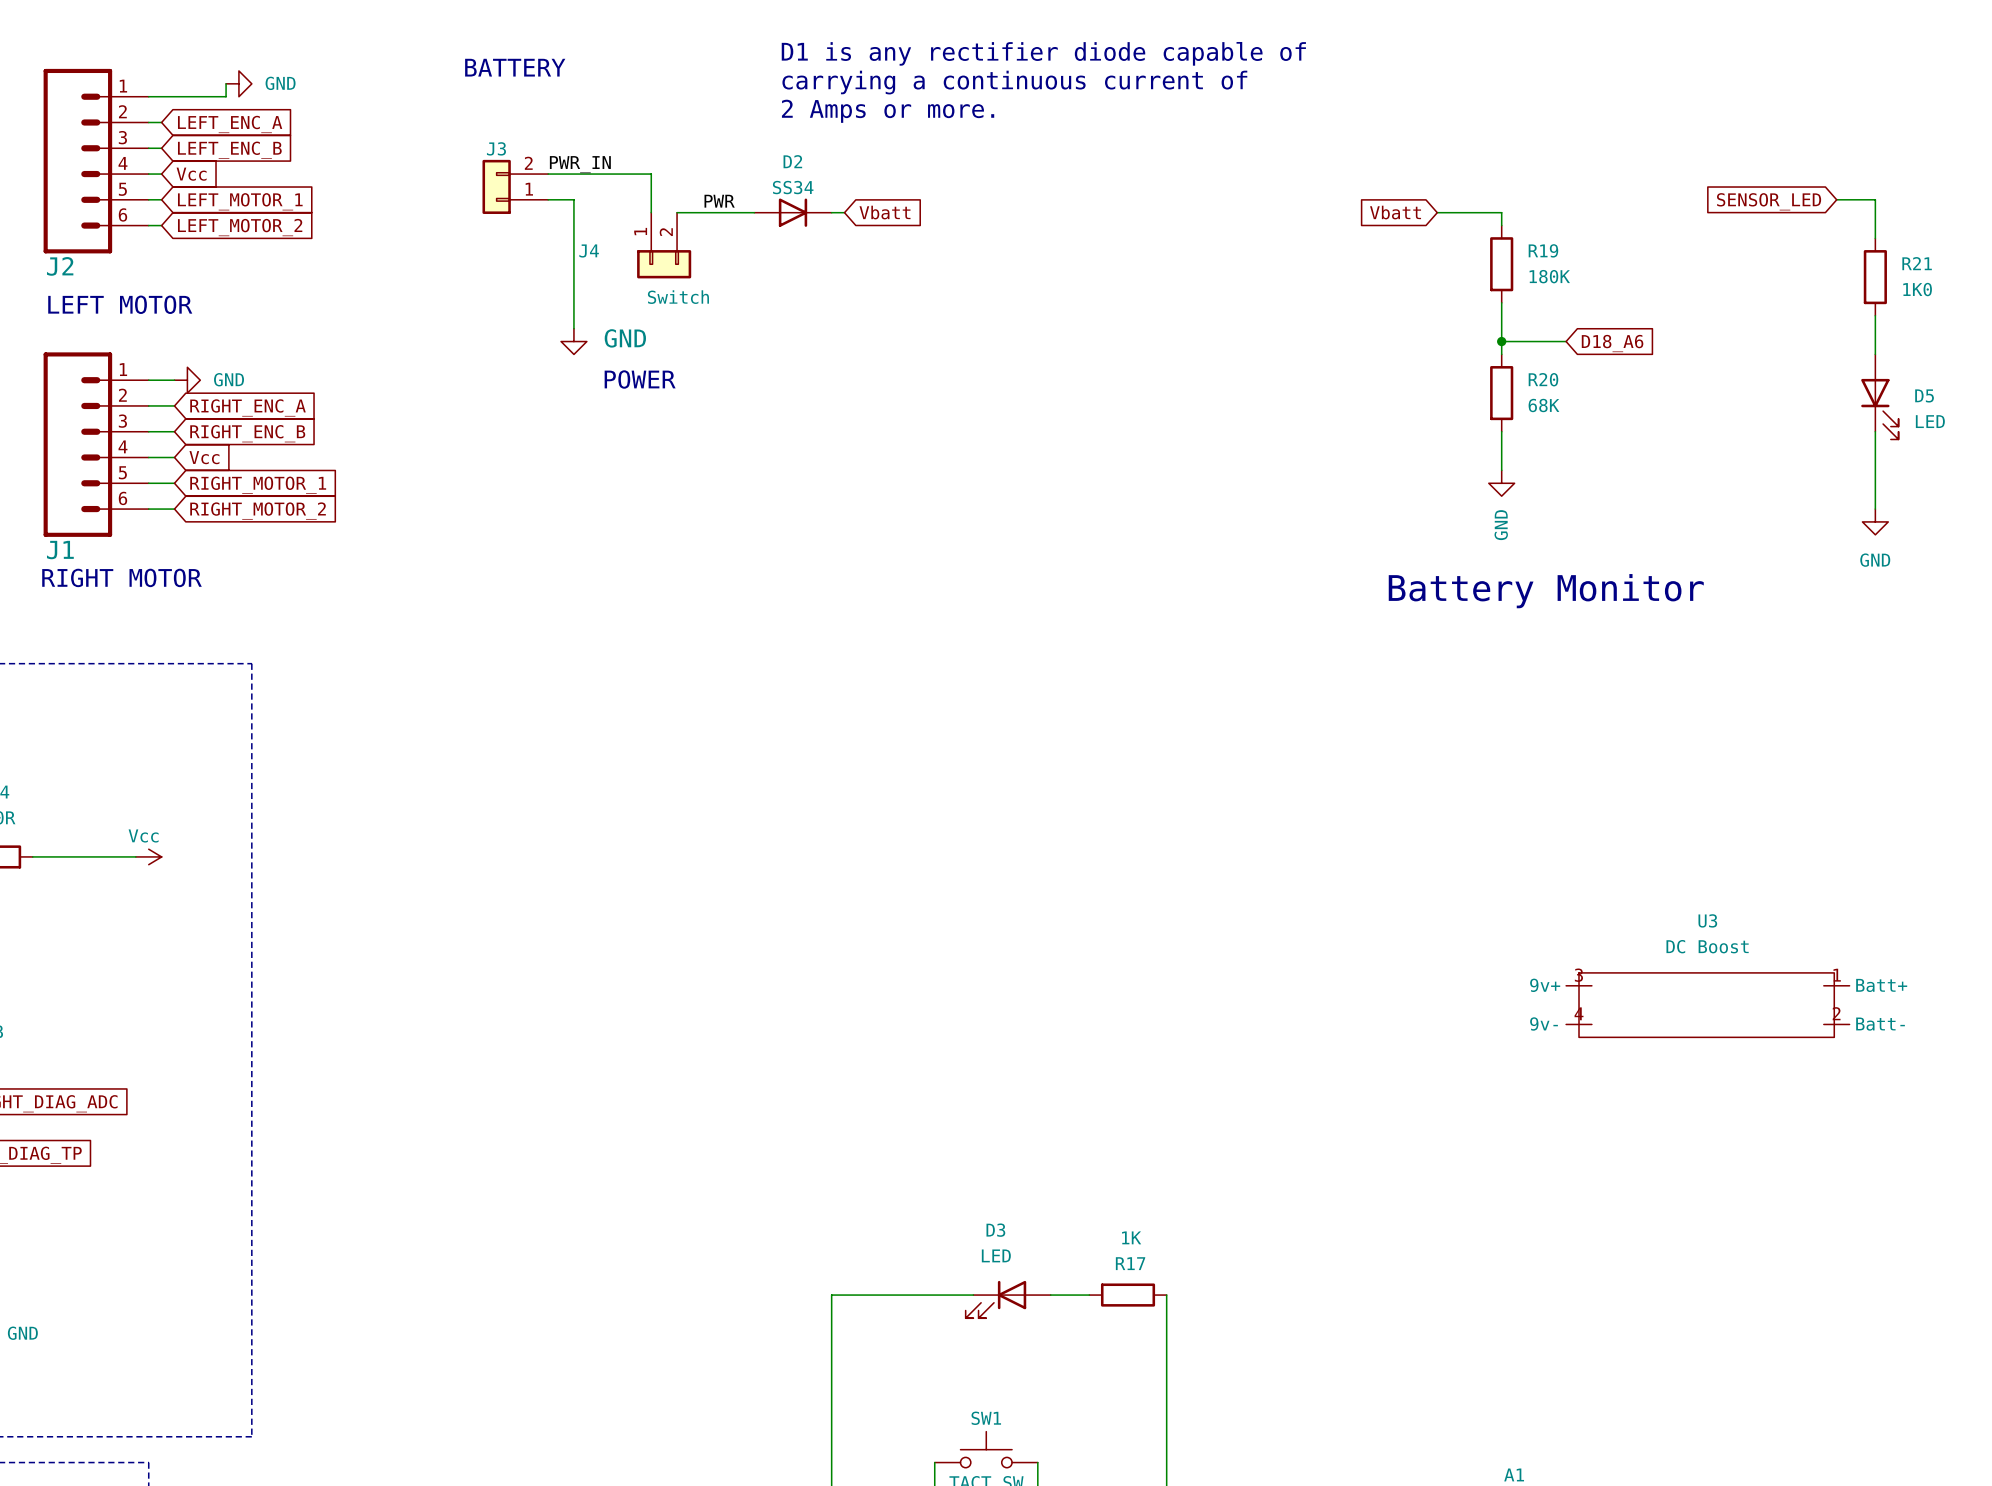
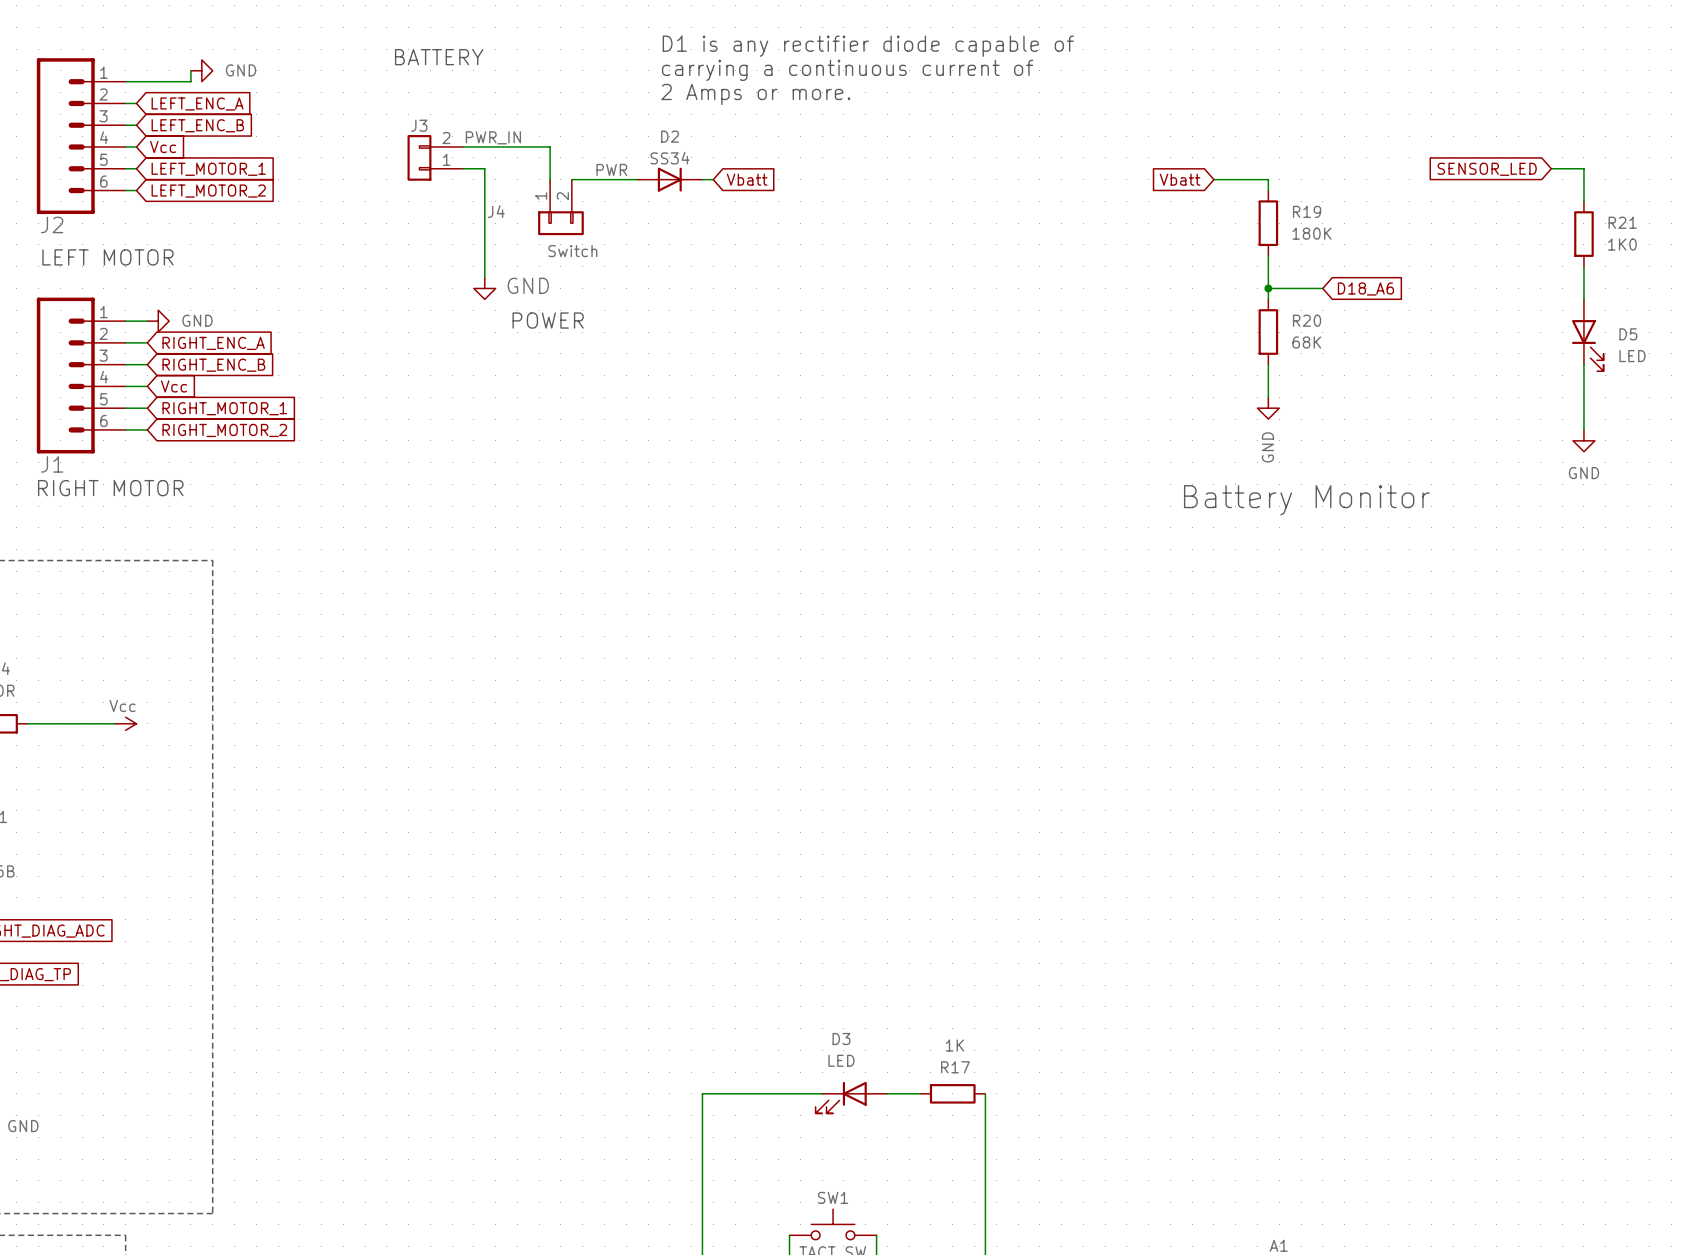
U3: DC Boost (1707, 1005) -> none

